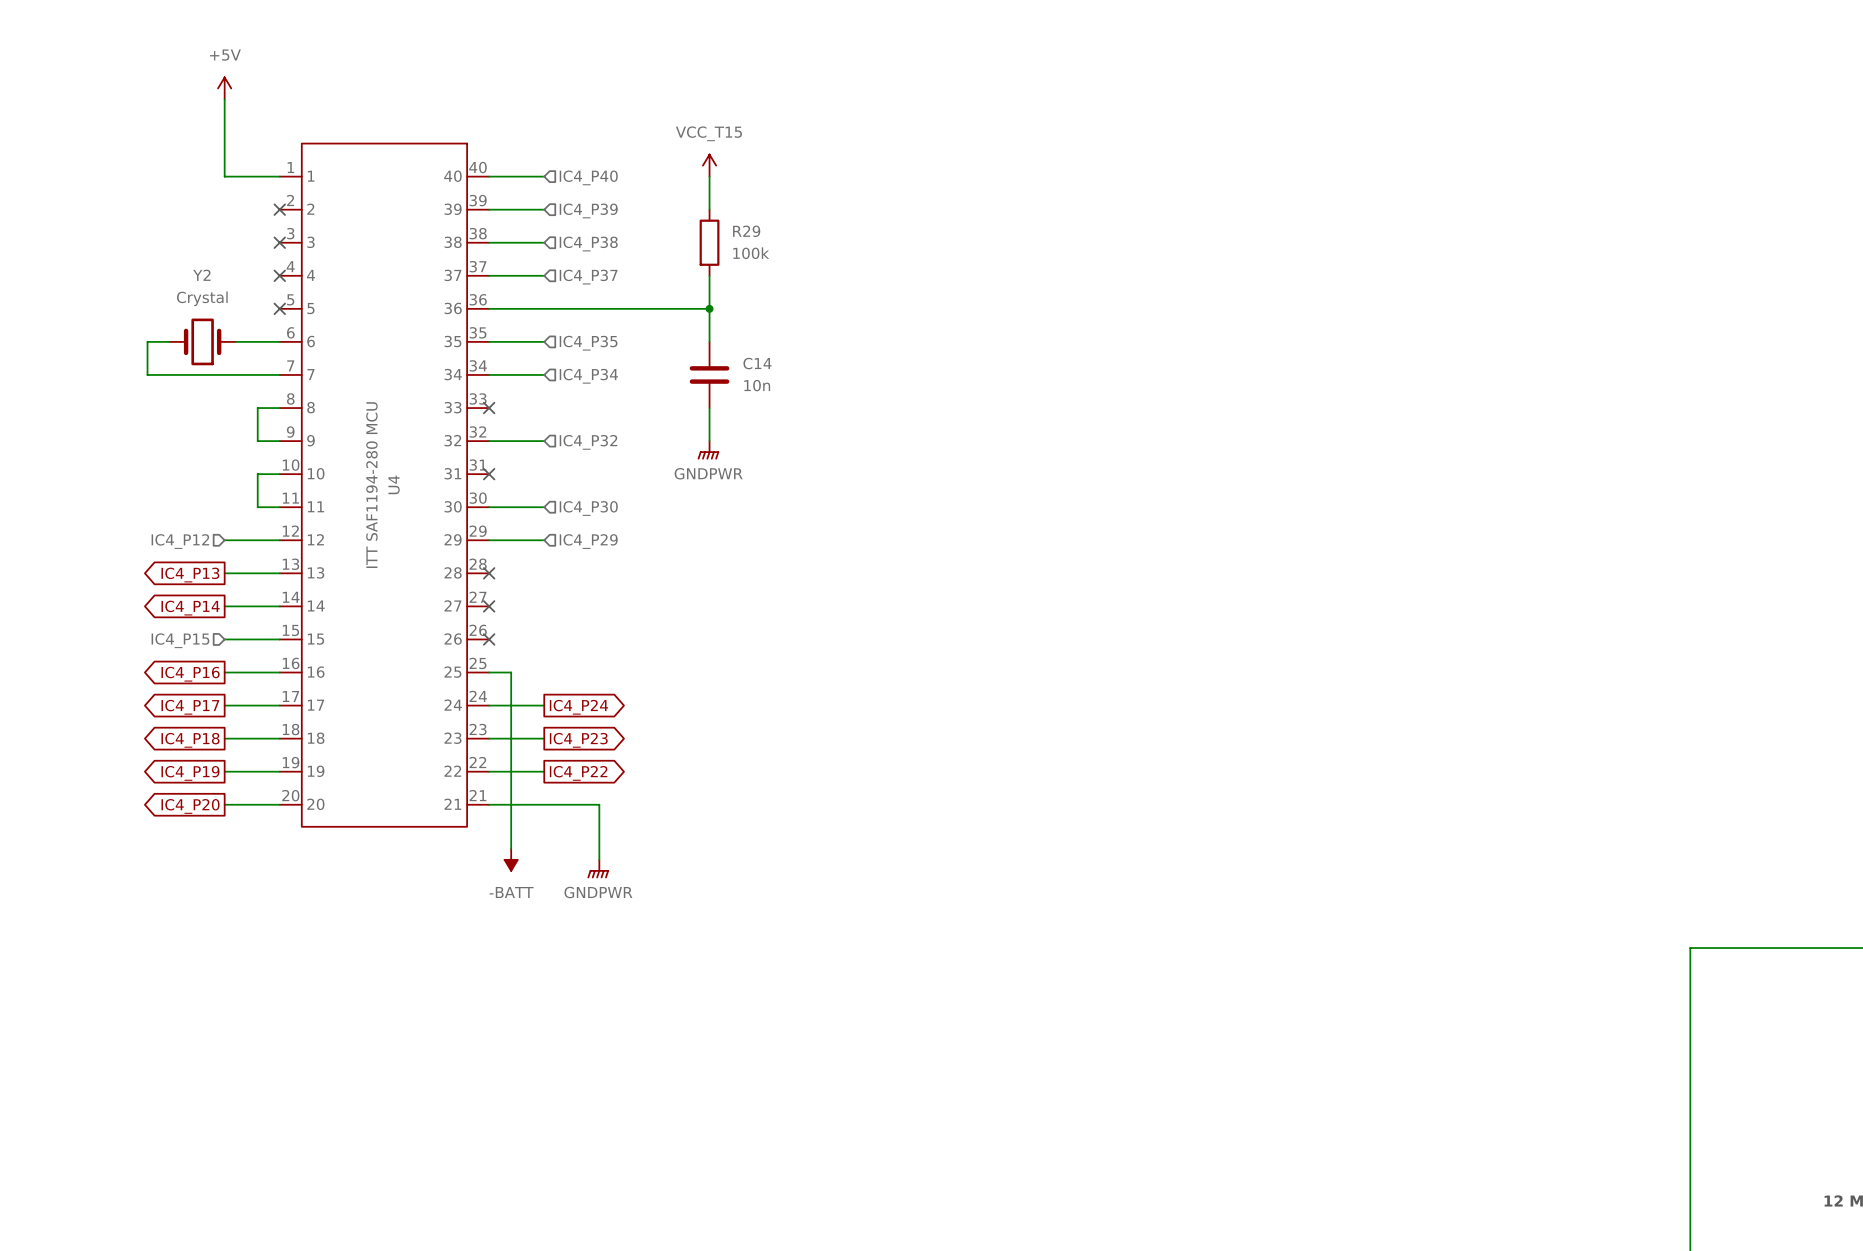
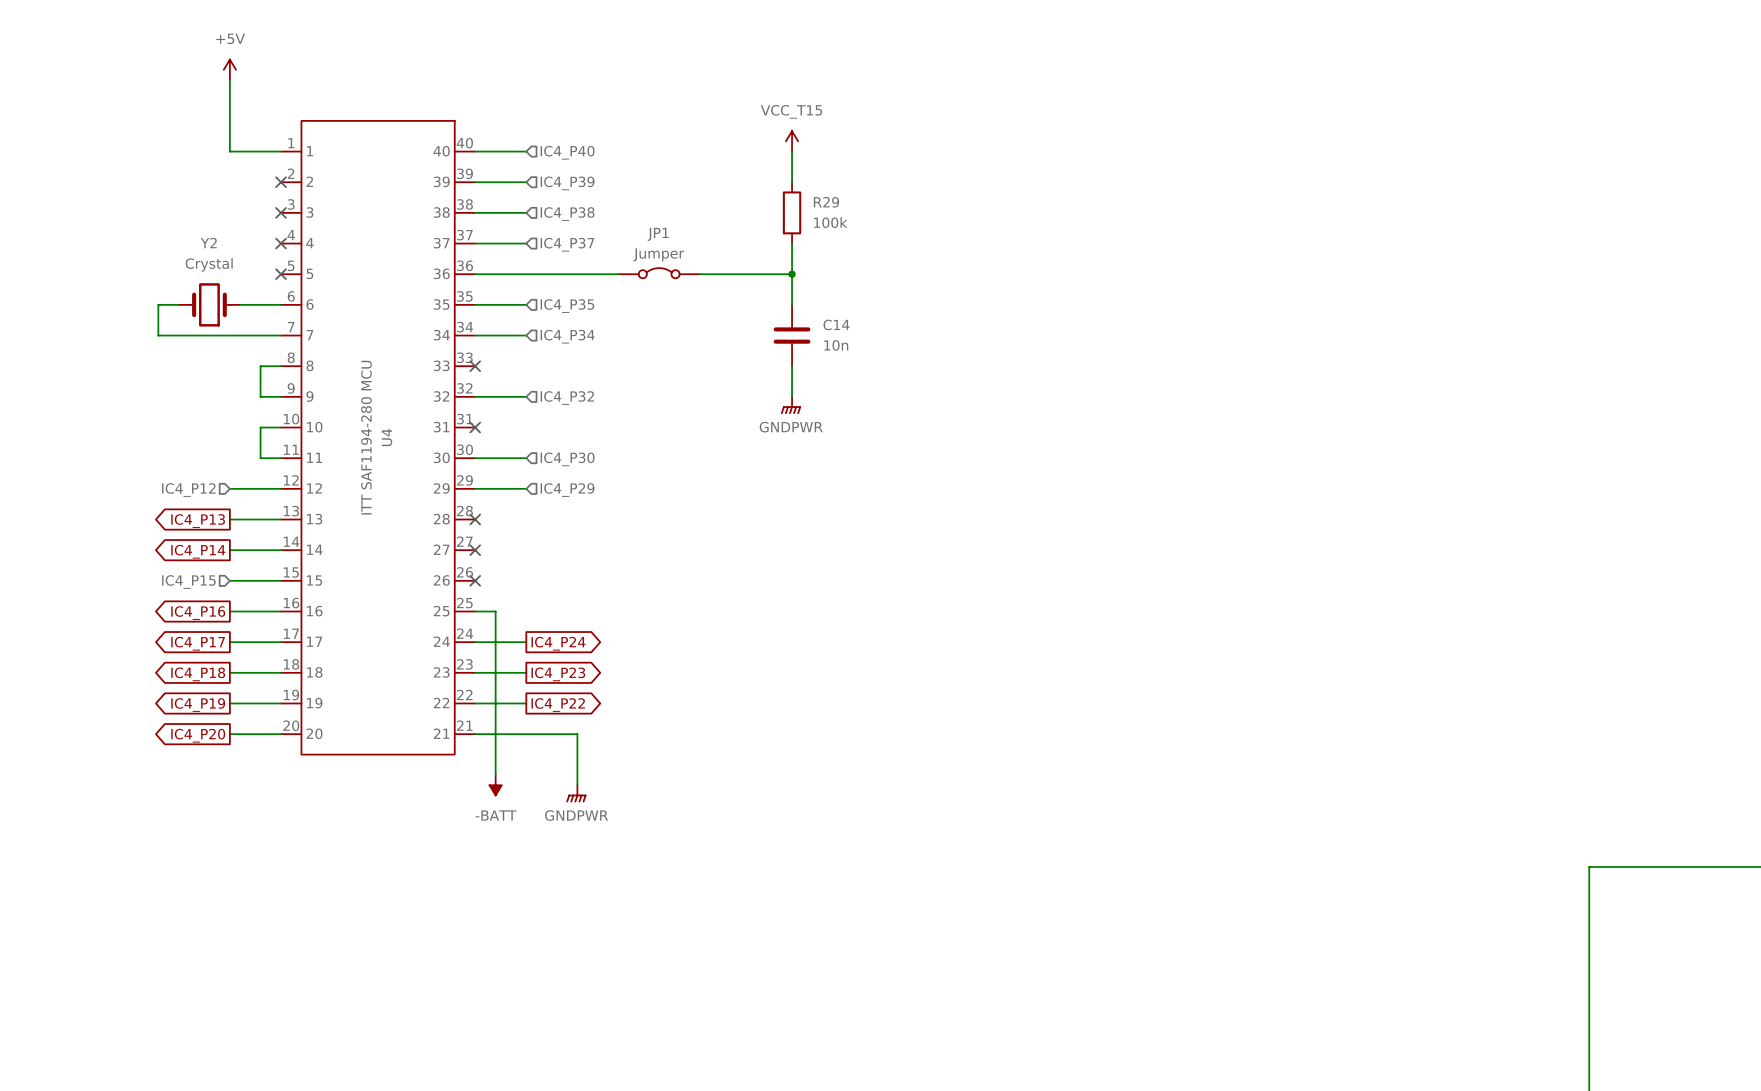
power symbol position: VCC_T15 (709, 165) -> VCC_T15 (792, 141)
wire: (709, 176) (709, 209) -> (792, 151) (792, 182)
R29 position: (709, 242) -> (792, 212)
wire: (709, 275) (709, 341) -> (792, 243) (792, 304)
JP1: none -> Jumper (659, 273)
wire: (643, 308) (709, 308) -> none
junction: (709, 308) -> none
wire: none -> (700, 274) (792, 274)
junction: none -> (792, 274)
C14 position: (709, 374) -> (792, 335)
wire: (709, 408) (709, 441) -> (792, 366) (792, 396)
power symbol position: GNDPWR (708, 450) -> GNDPWR (791, 405)

